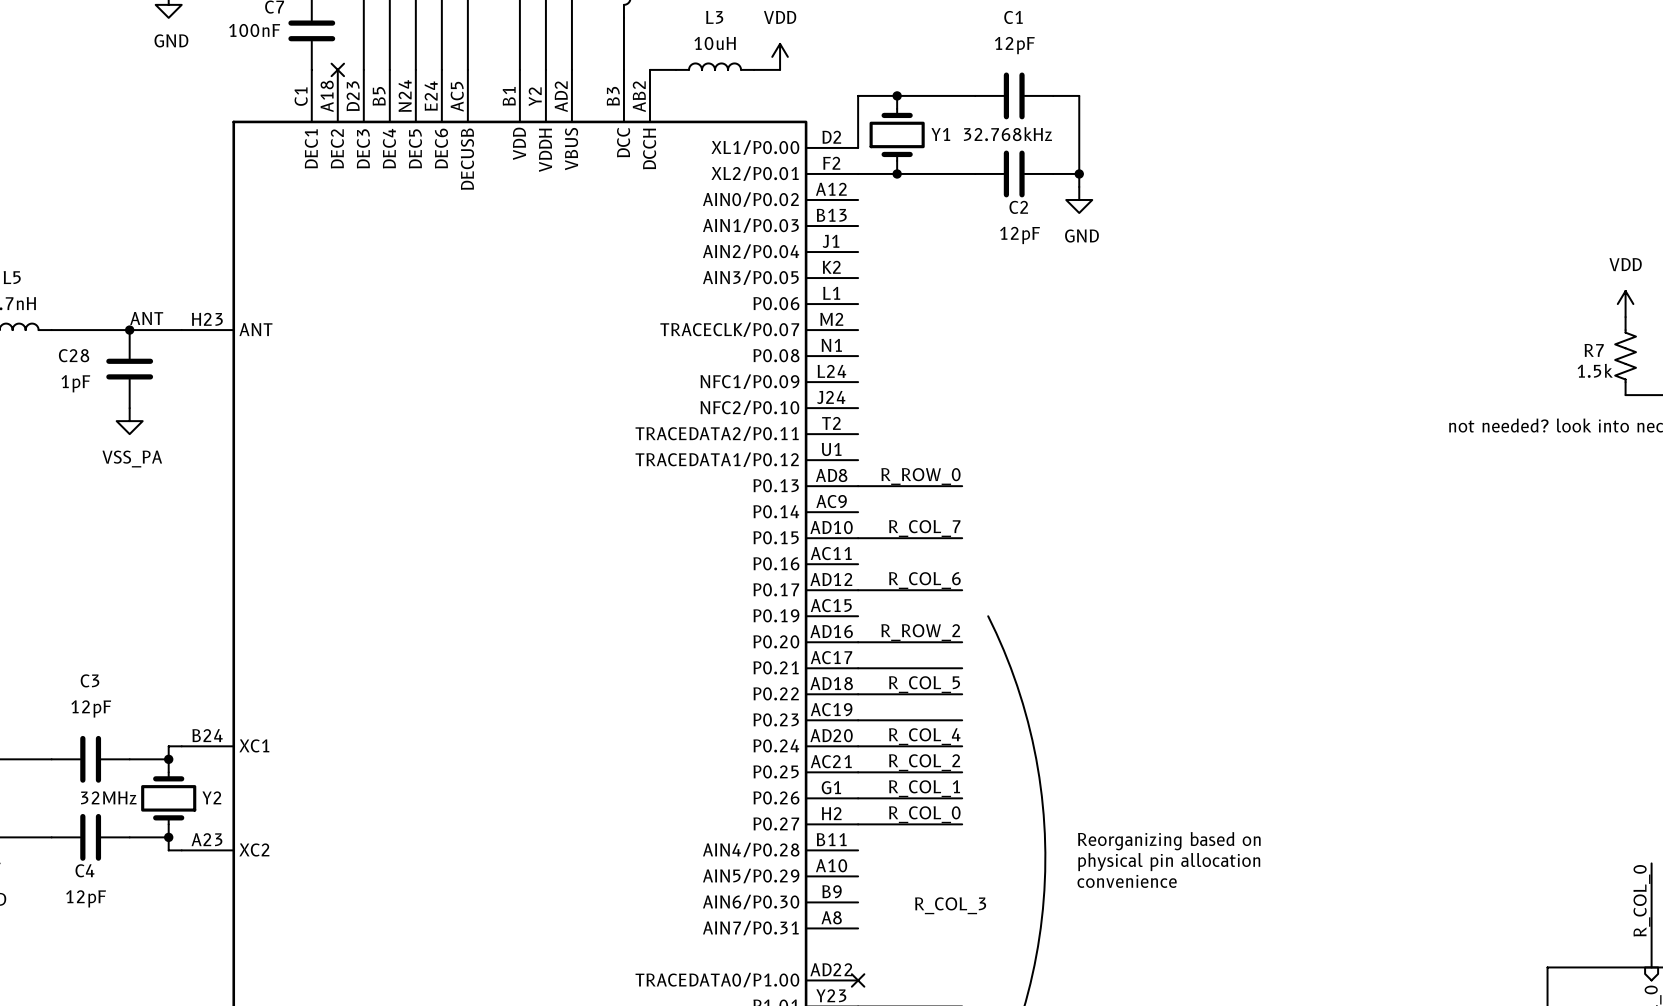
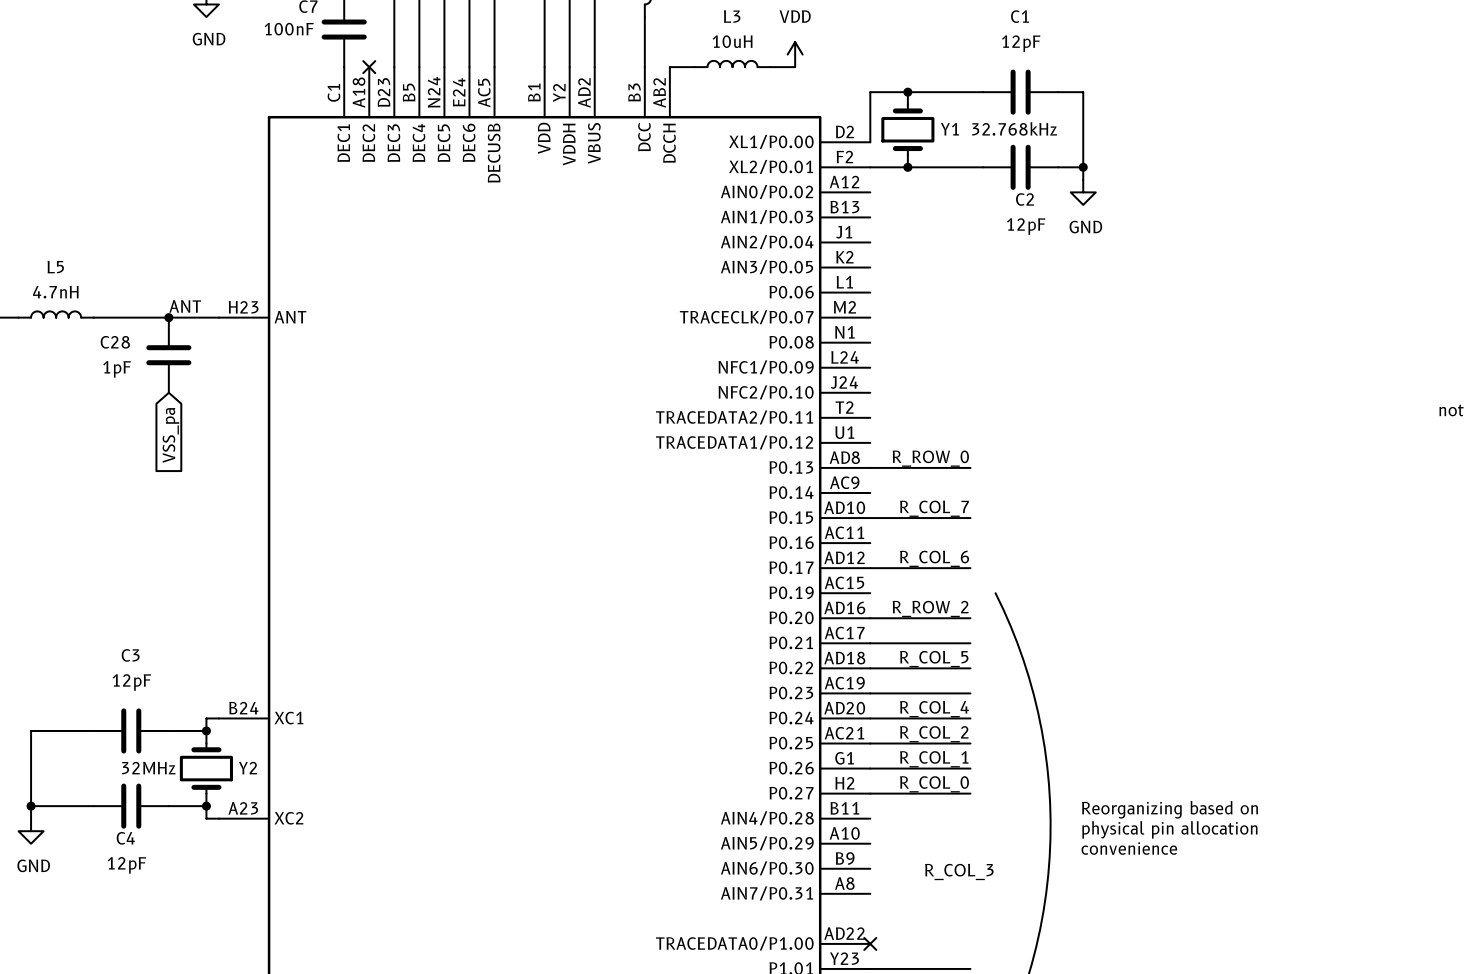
power symbol: VSS_PA (129, 421) -> none
global label: none -> VSS_pa (170, 435)

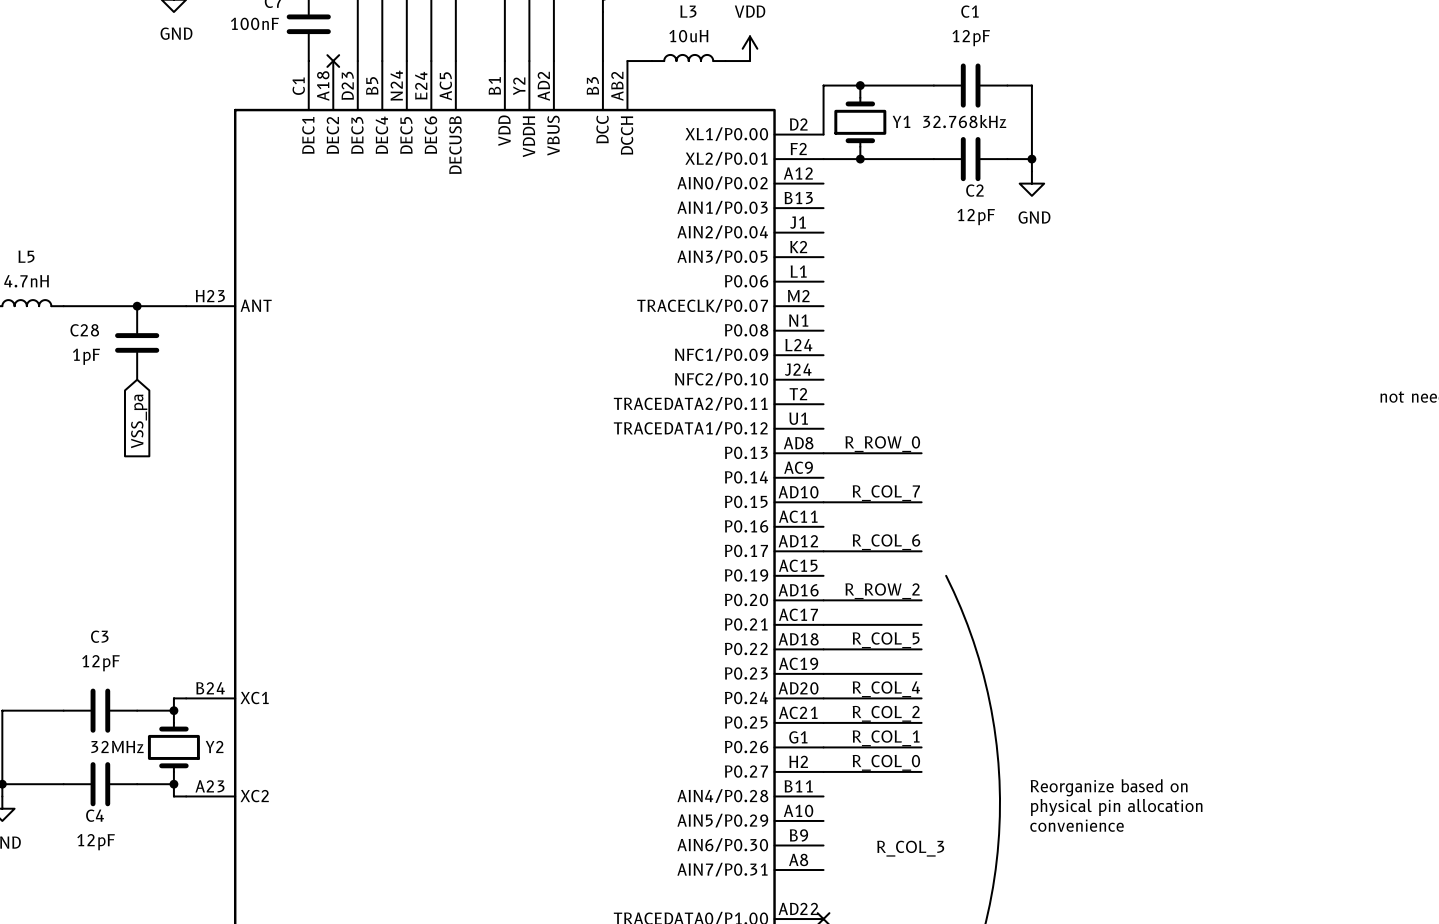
label: ANT (185, 306) -> none
text: Reorganizing based on (1169, 809) -> Reorganize based on (1109, 787)

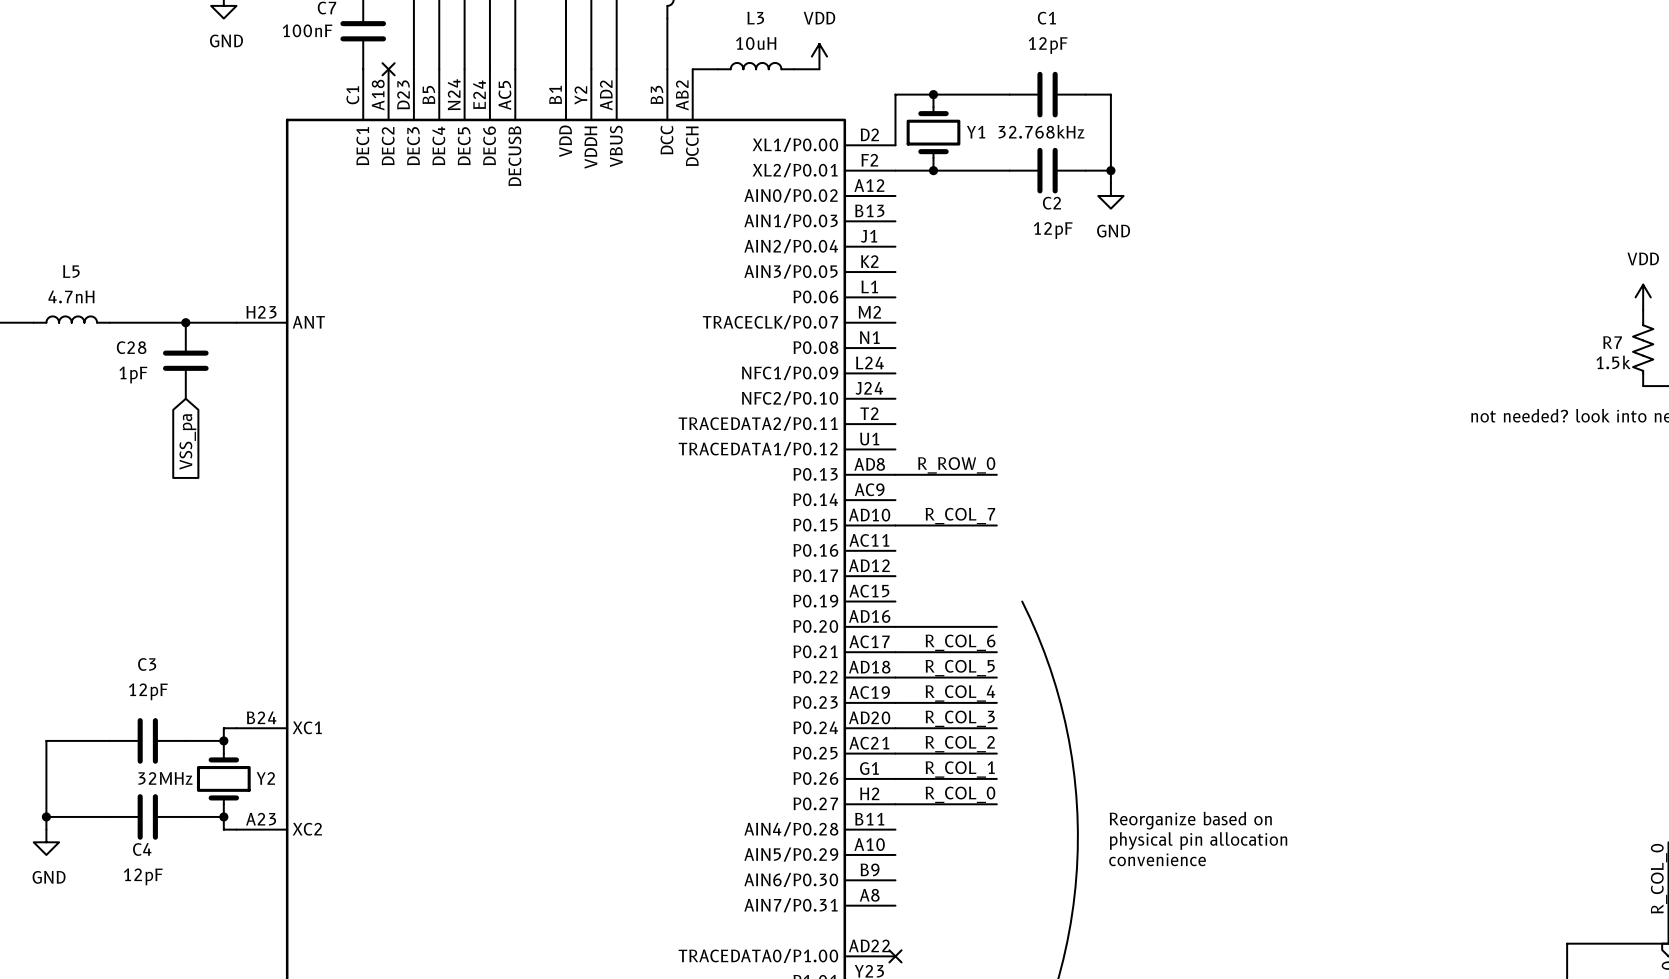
label position: R_COL_6 (886, 542) -> R_COL_6 (960, 642)
wire: (823, 551) (921, 551) -> none
label: R_ROW_2 (882, 591) -> none
label: none -> R_COL_4 (960, 693)
label: R_COL_4 (886, 689) -> R_COL_3 (960, 718)
label: R_COL_3 (910, 848) -> none

